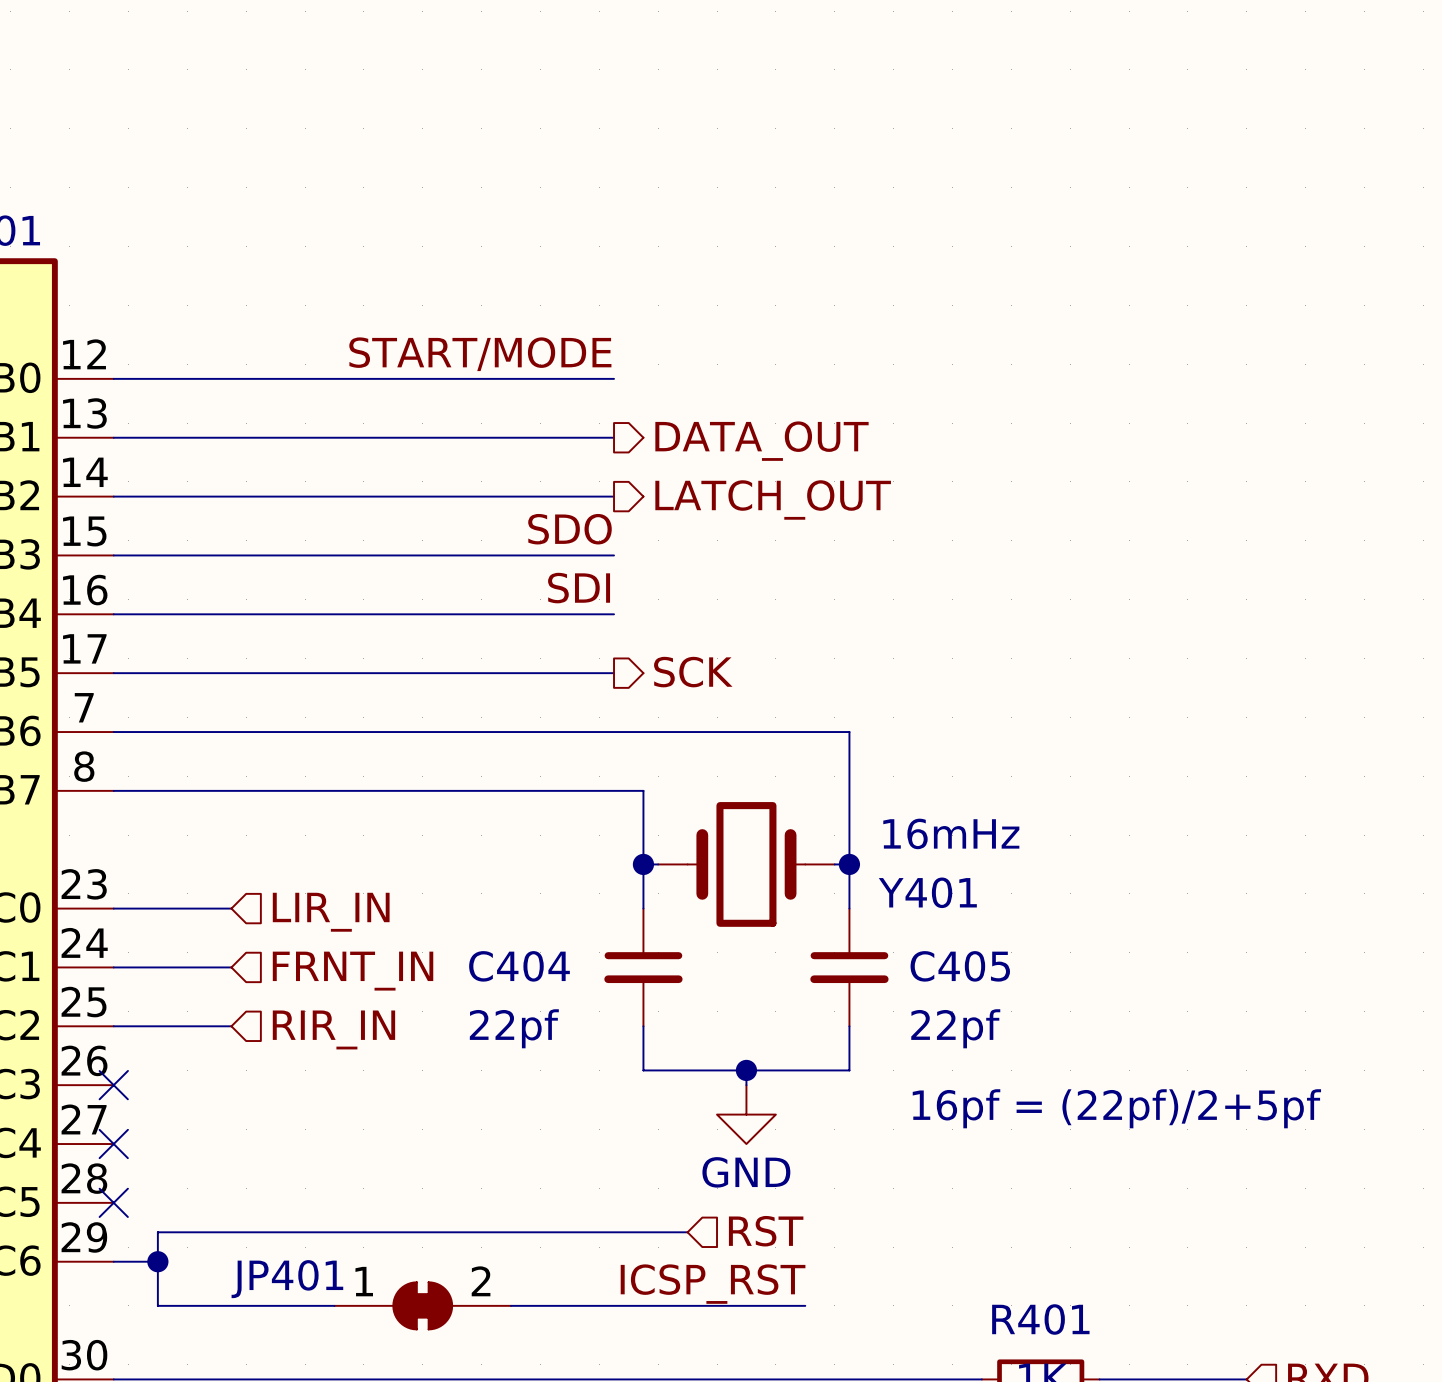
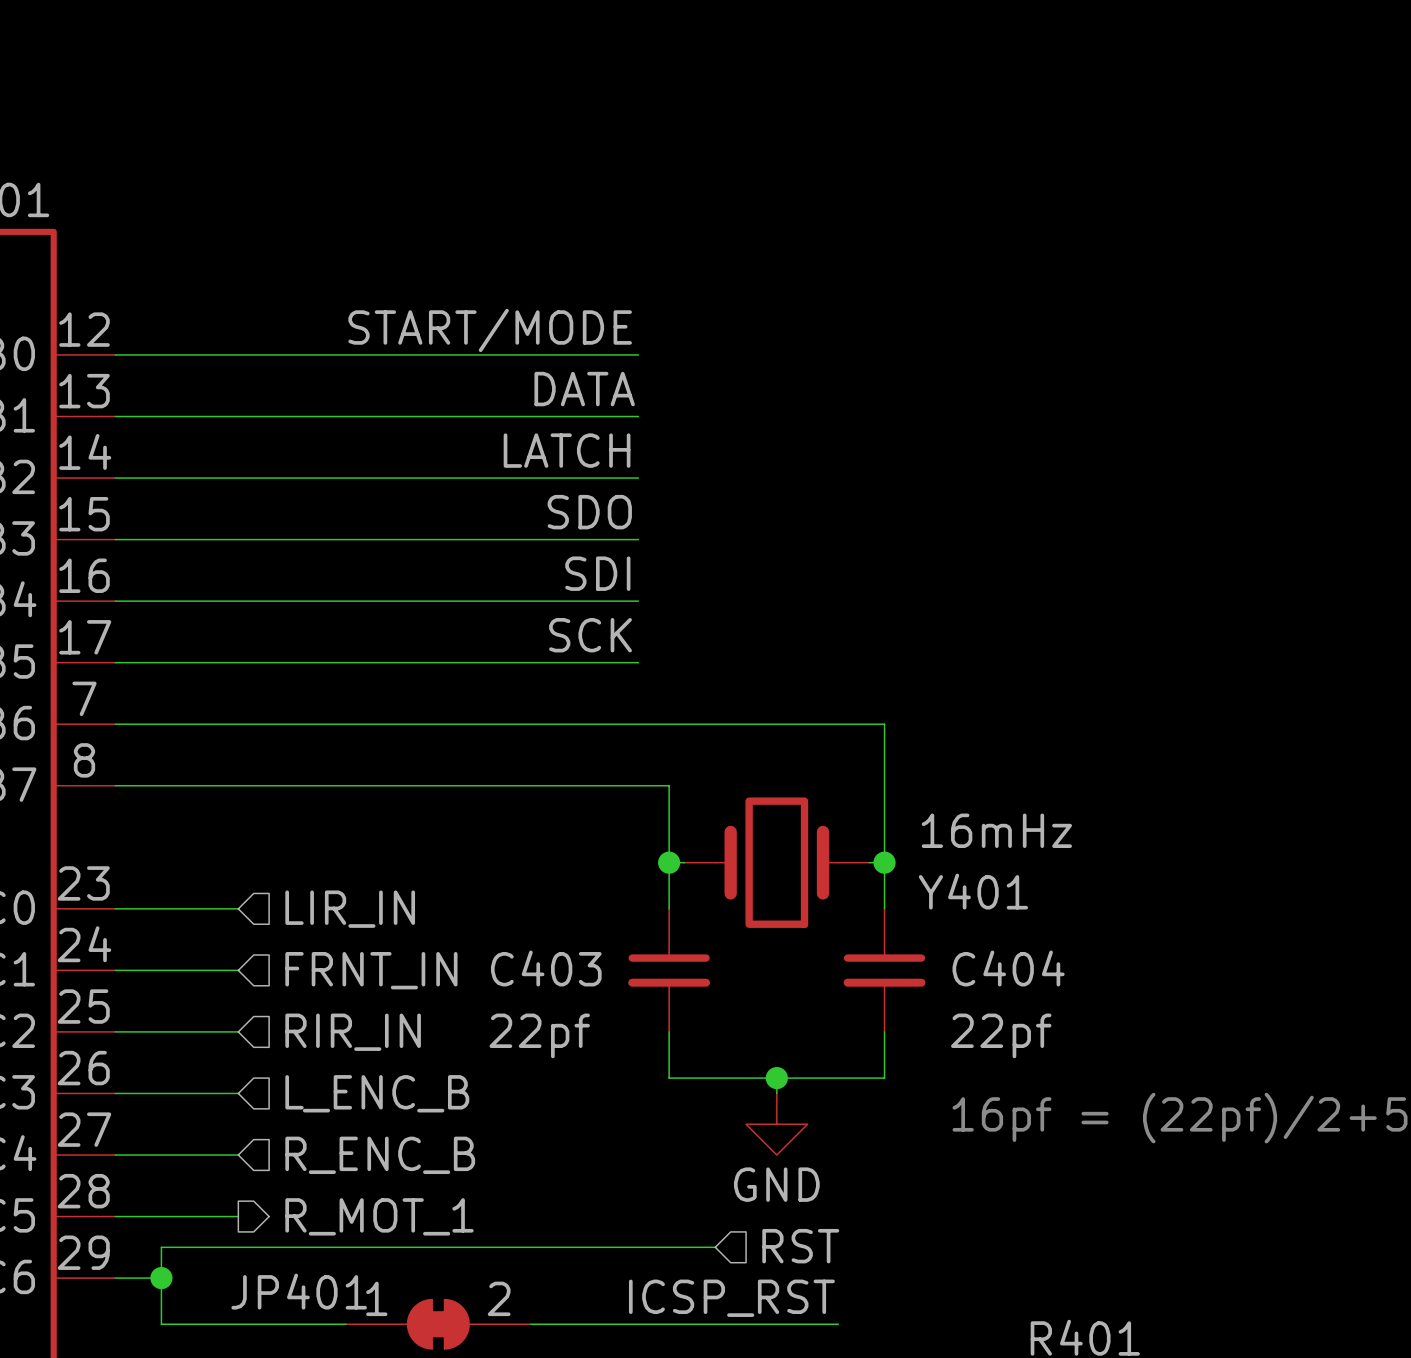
label: none -> DATA (584, 389)
hierarchical label: DATA_OUT (761, 441) -> none
label: none -> LATCH (567, 450)
hierarchical label: LATCH_OUT (773, 499) -> none
label: none -> SCK (590, 635)
hierarchical label: SCK (693, 672) -> none
C404 name: C404 (519, 966) -> C403 (546, 968)
C405 name: C405 (960, 966) -> C404 (1008, 968)
wire: none -> (115, 1093) (238, 1093)
no-connect mark: (113, 1085) -> none
hierarchical label: none -> L_ENC_B (377, 1093)
wire: none -> (115, 1155) (238, 1155)
no-connect mark: (113, 1144) -> none
hierarchical label: none -> R_ENC_B (380, 1155)
wire: none -> (115, 1216) (238, 1216)
no-connect mark: (113, 1202) -> none
hierarchical label: none -> R_MOT_1 (379, 1216)

